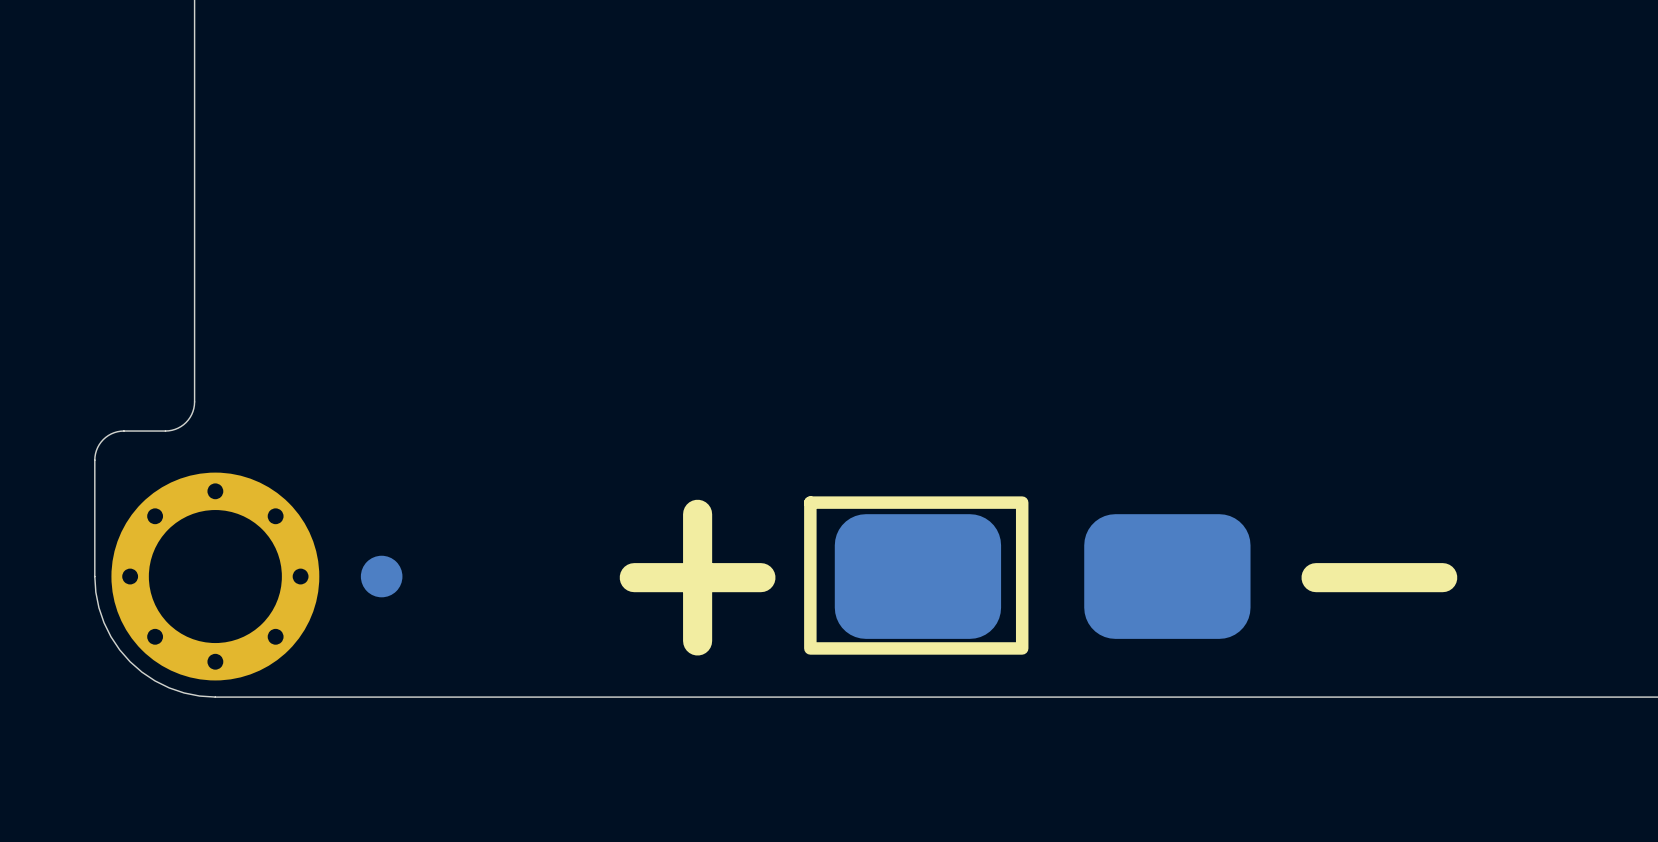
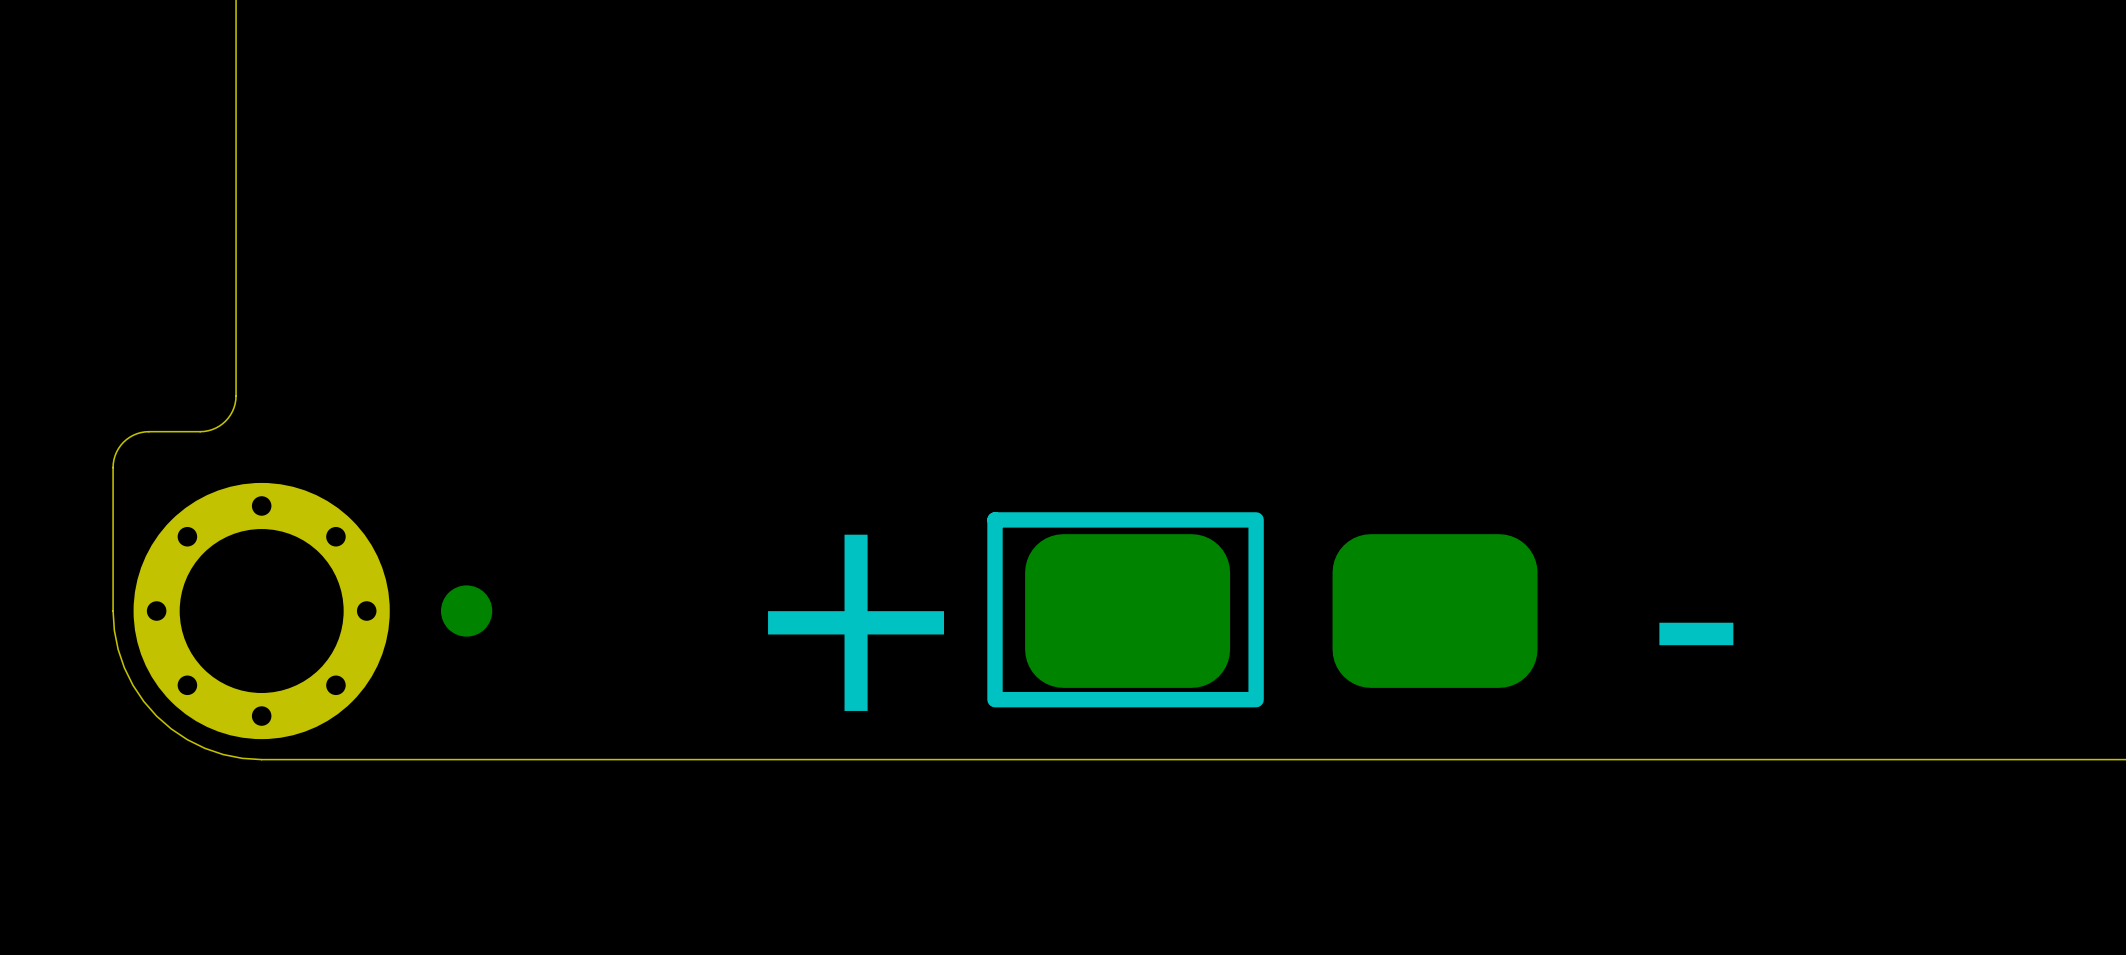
text position: + (697, 577) -> + (856, 622)
text position: - (1379, 577) -> - (1696, 633)

